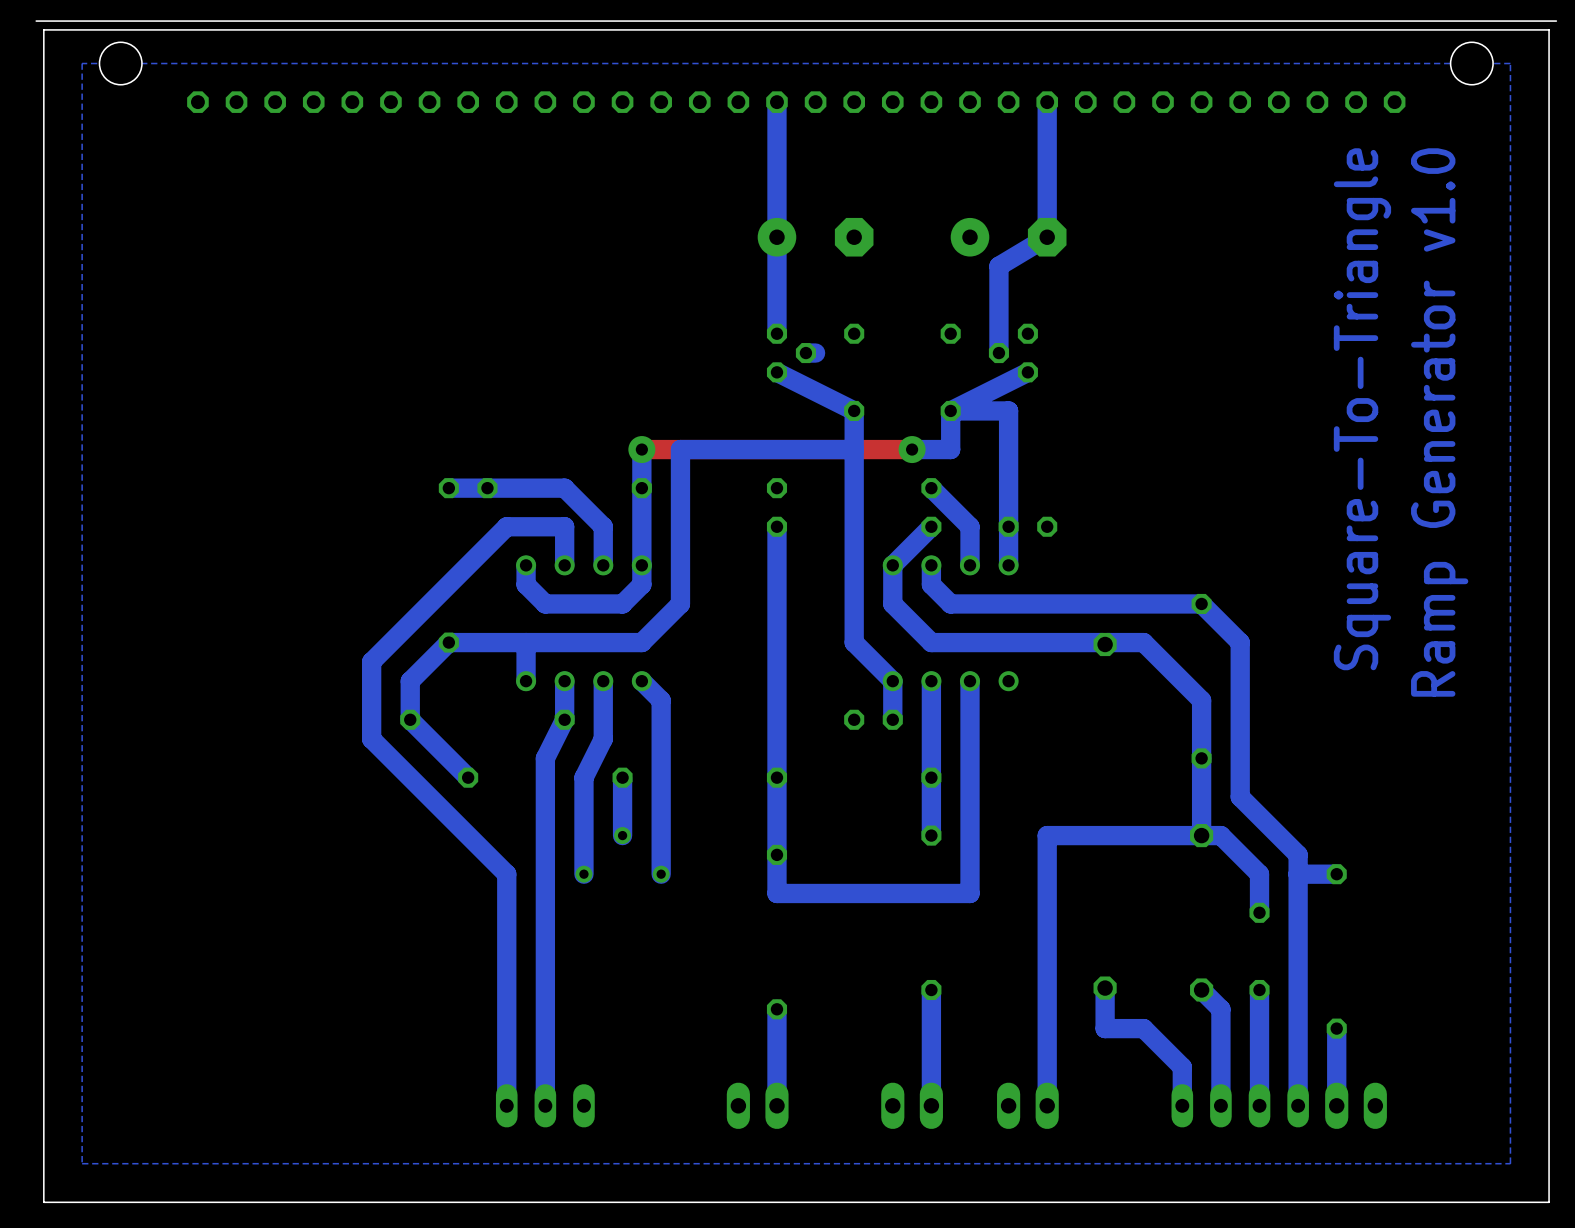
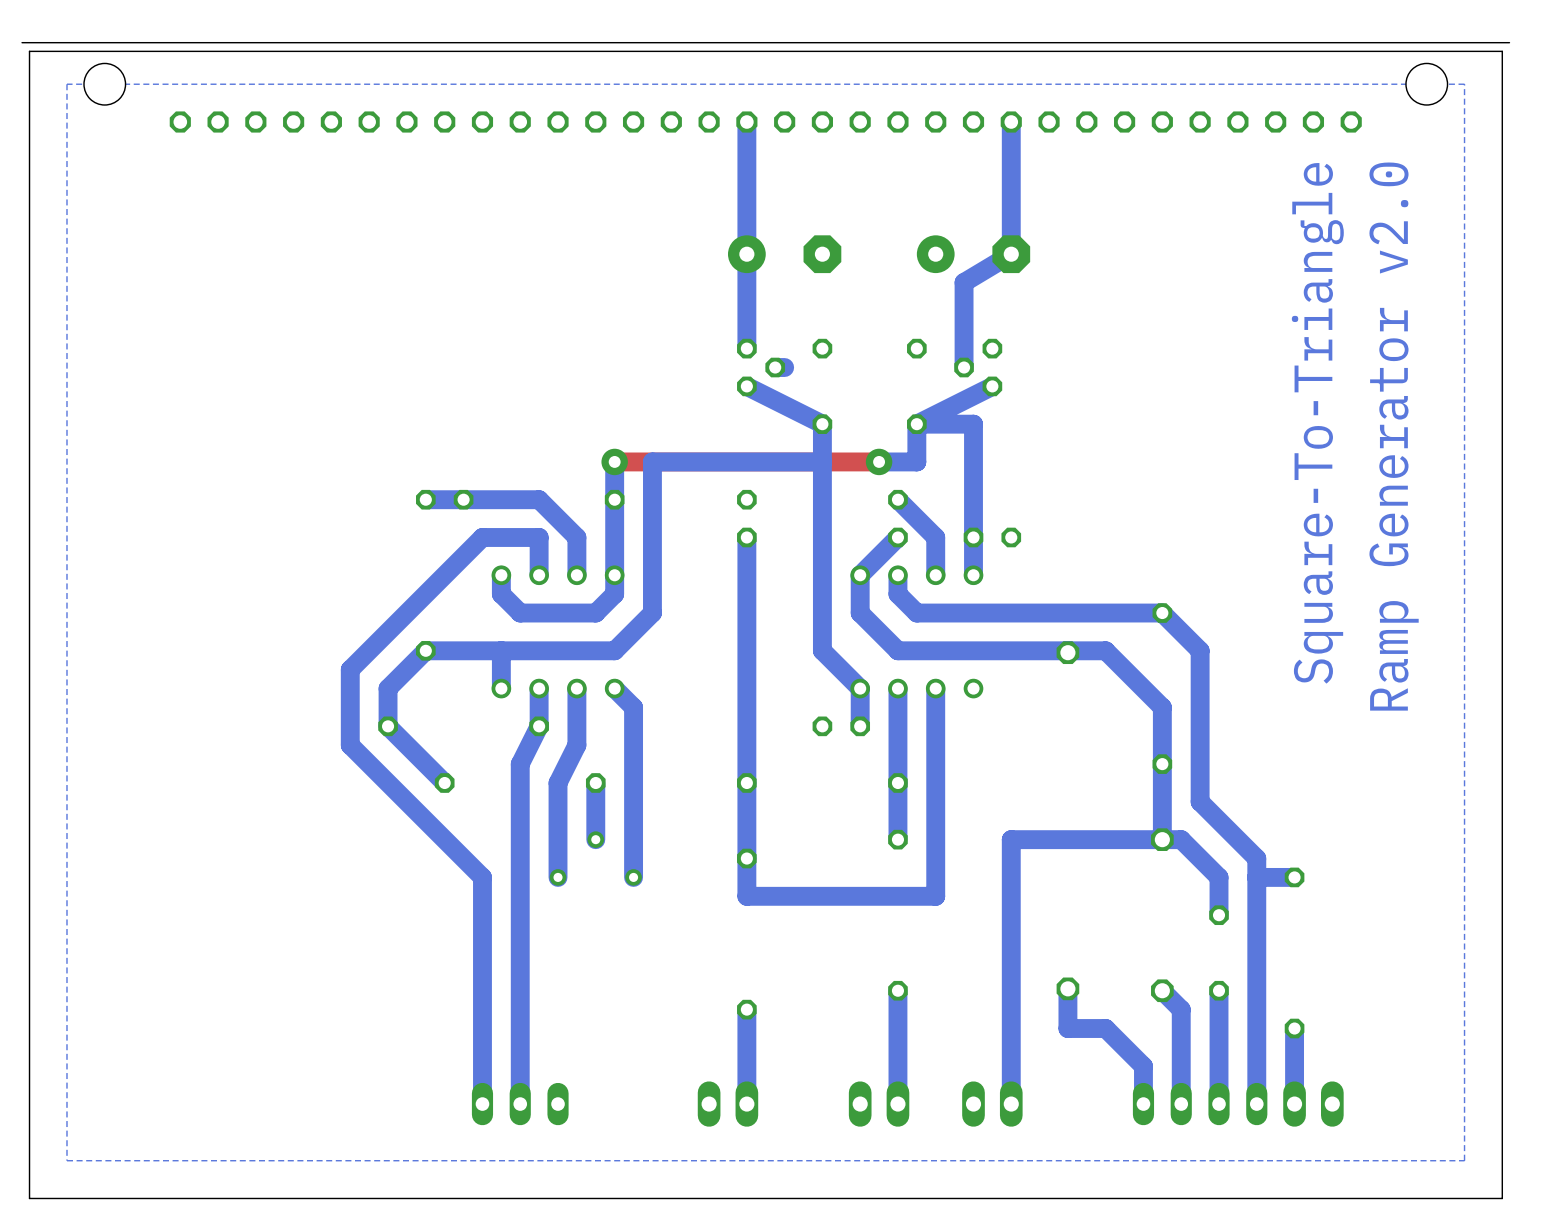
text: Ramp Generator v1.0 (1439, 422) -> Ramp Generator v2.0 (1394, 436)

